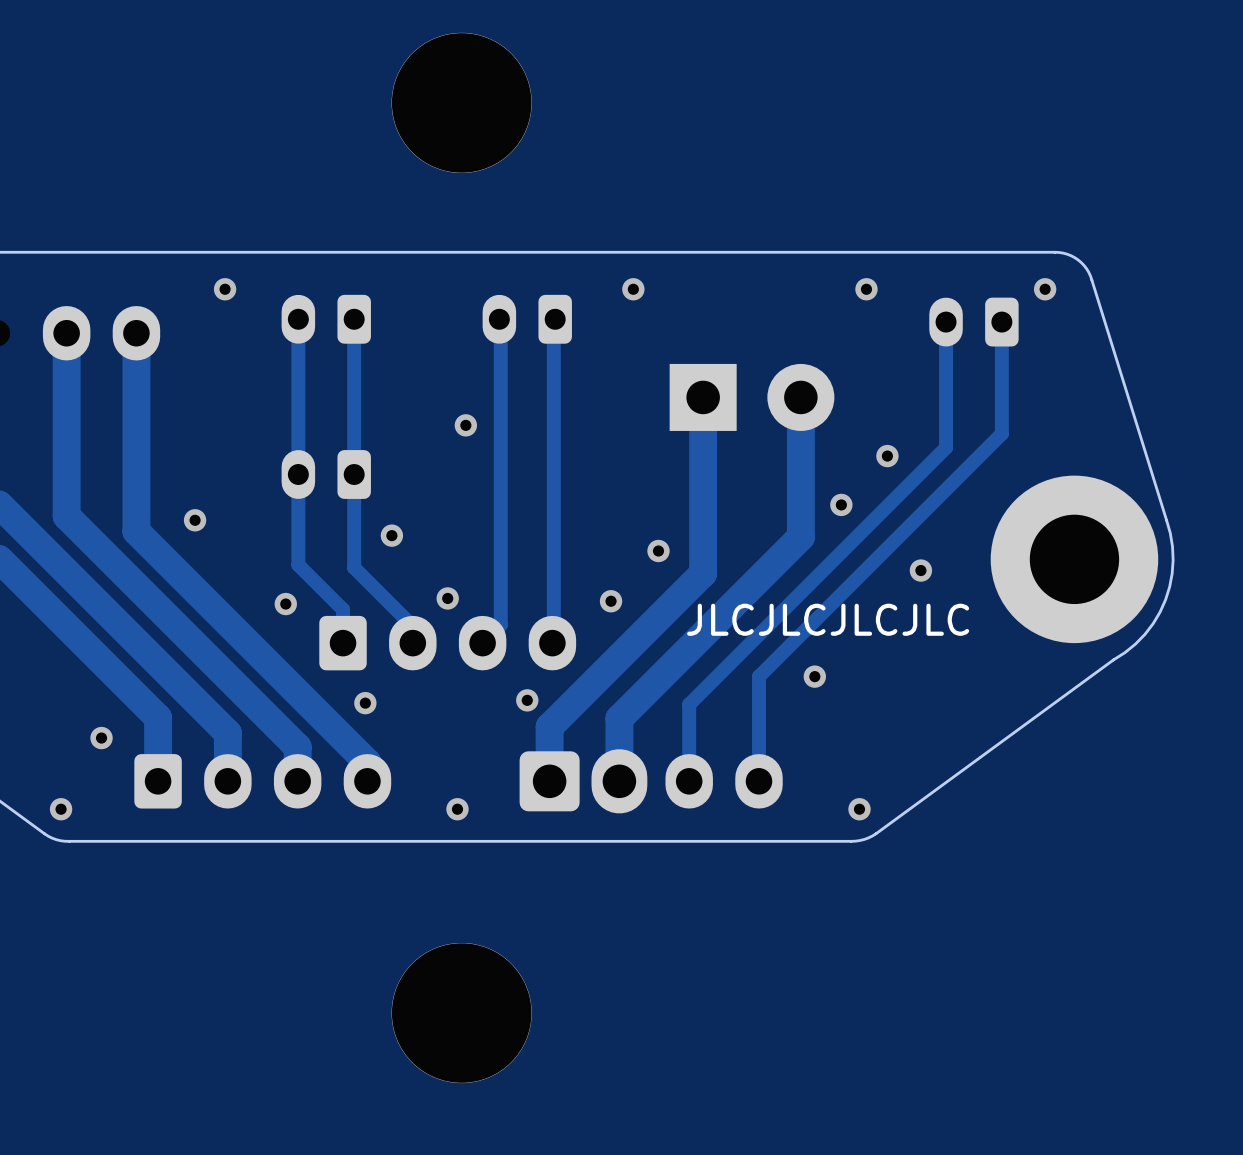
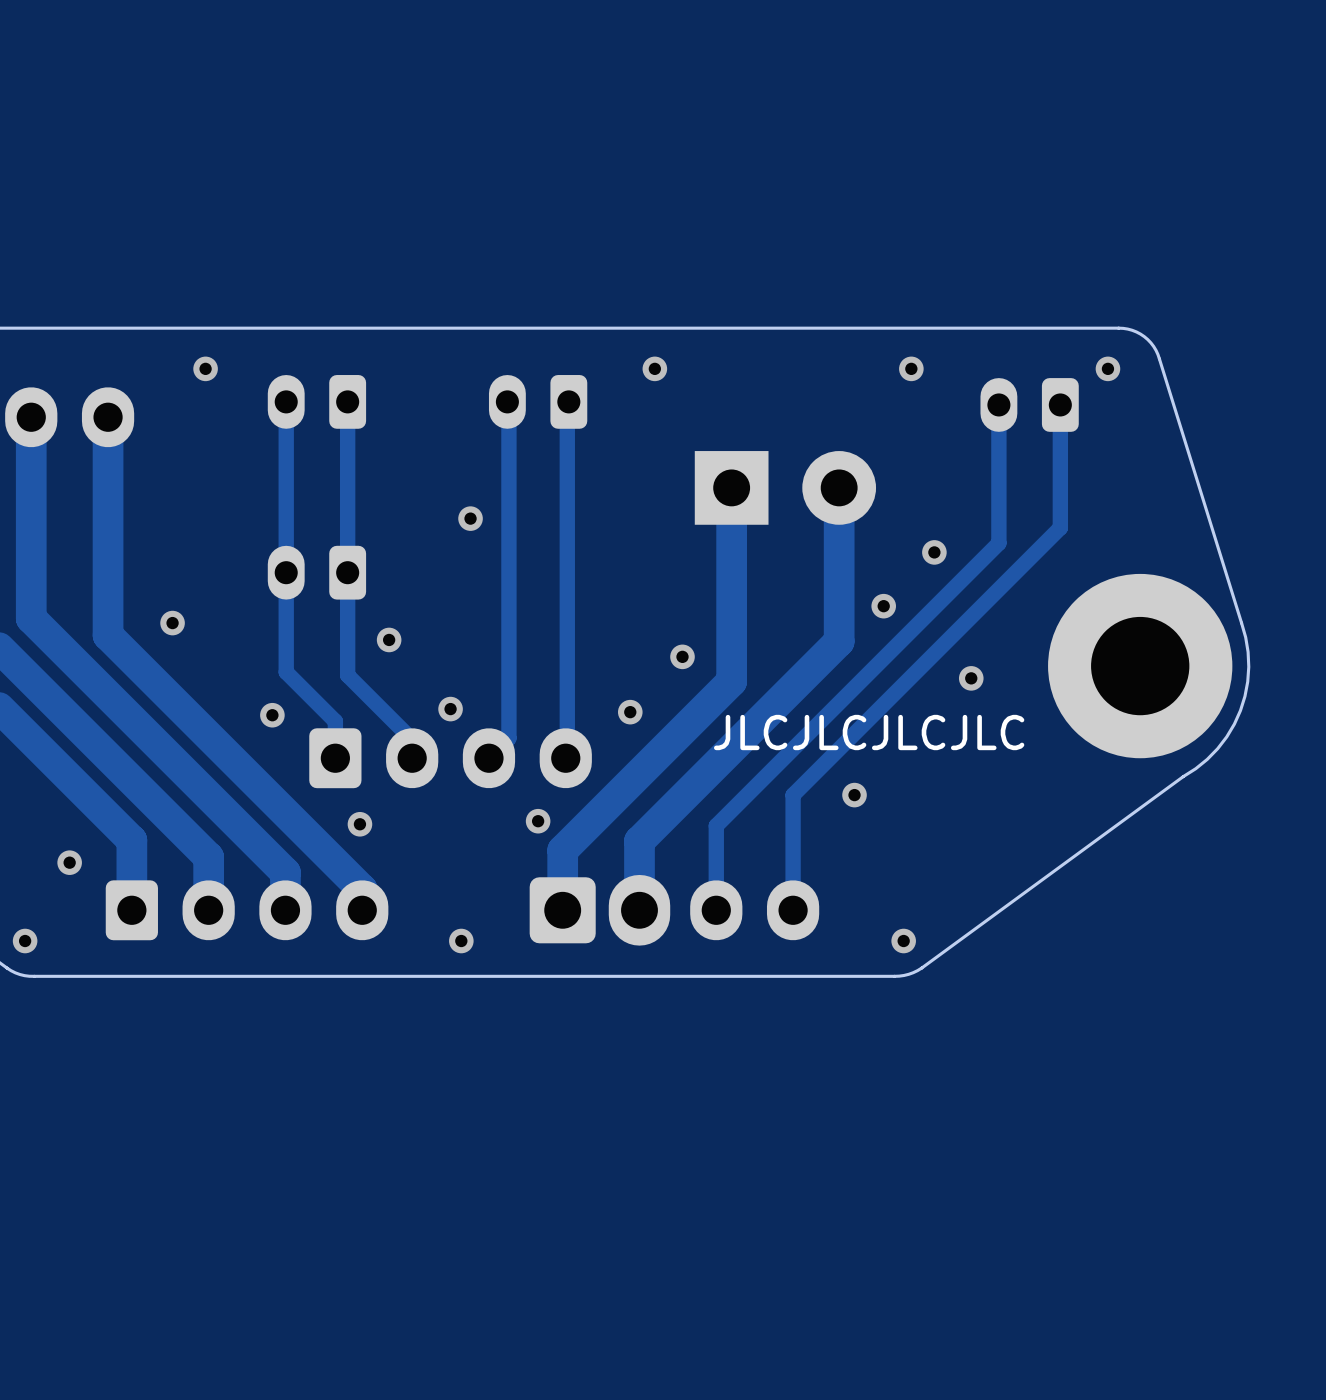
part: (461, 102) -> none
part: (461, 1013) -> none

